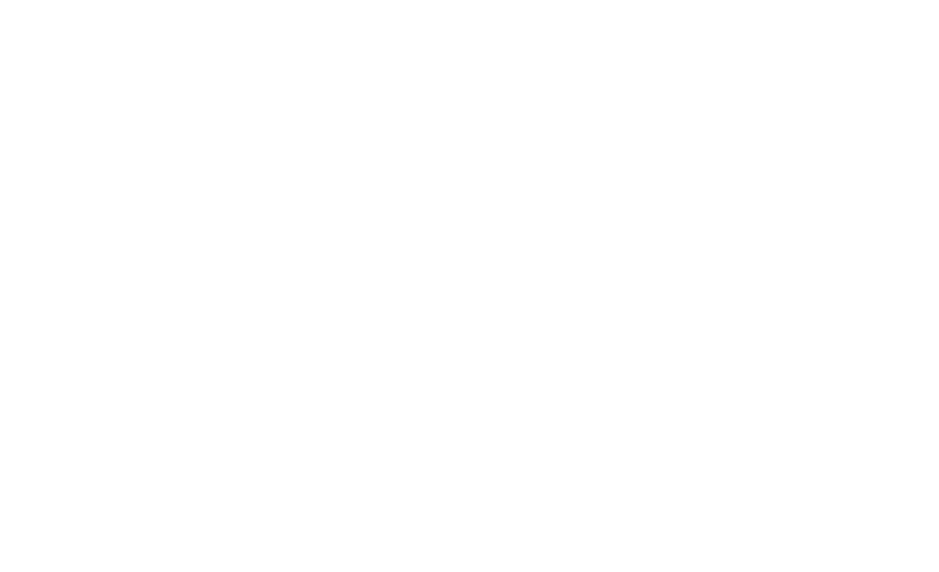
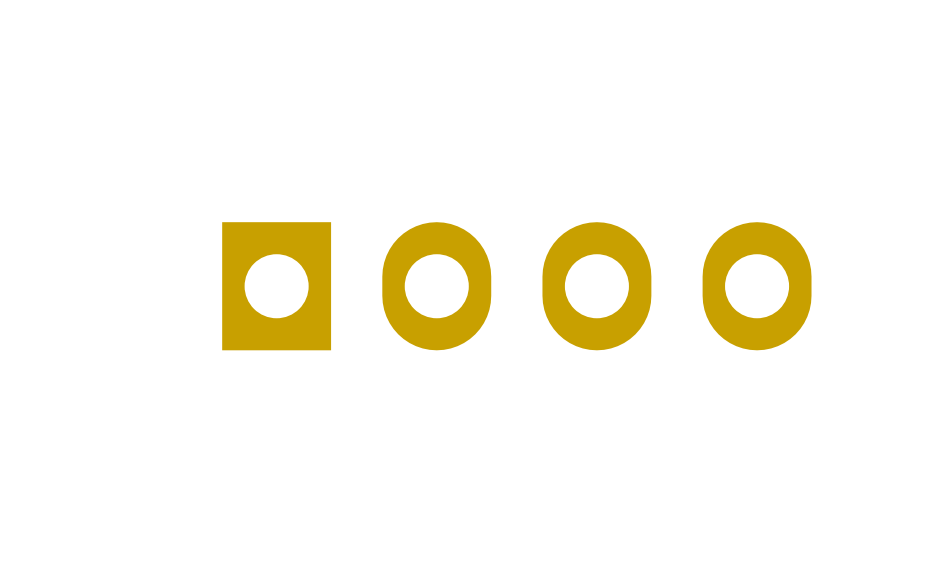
part: none -> (516, 286)

